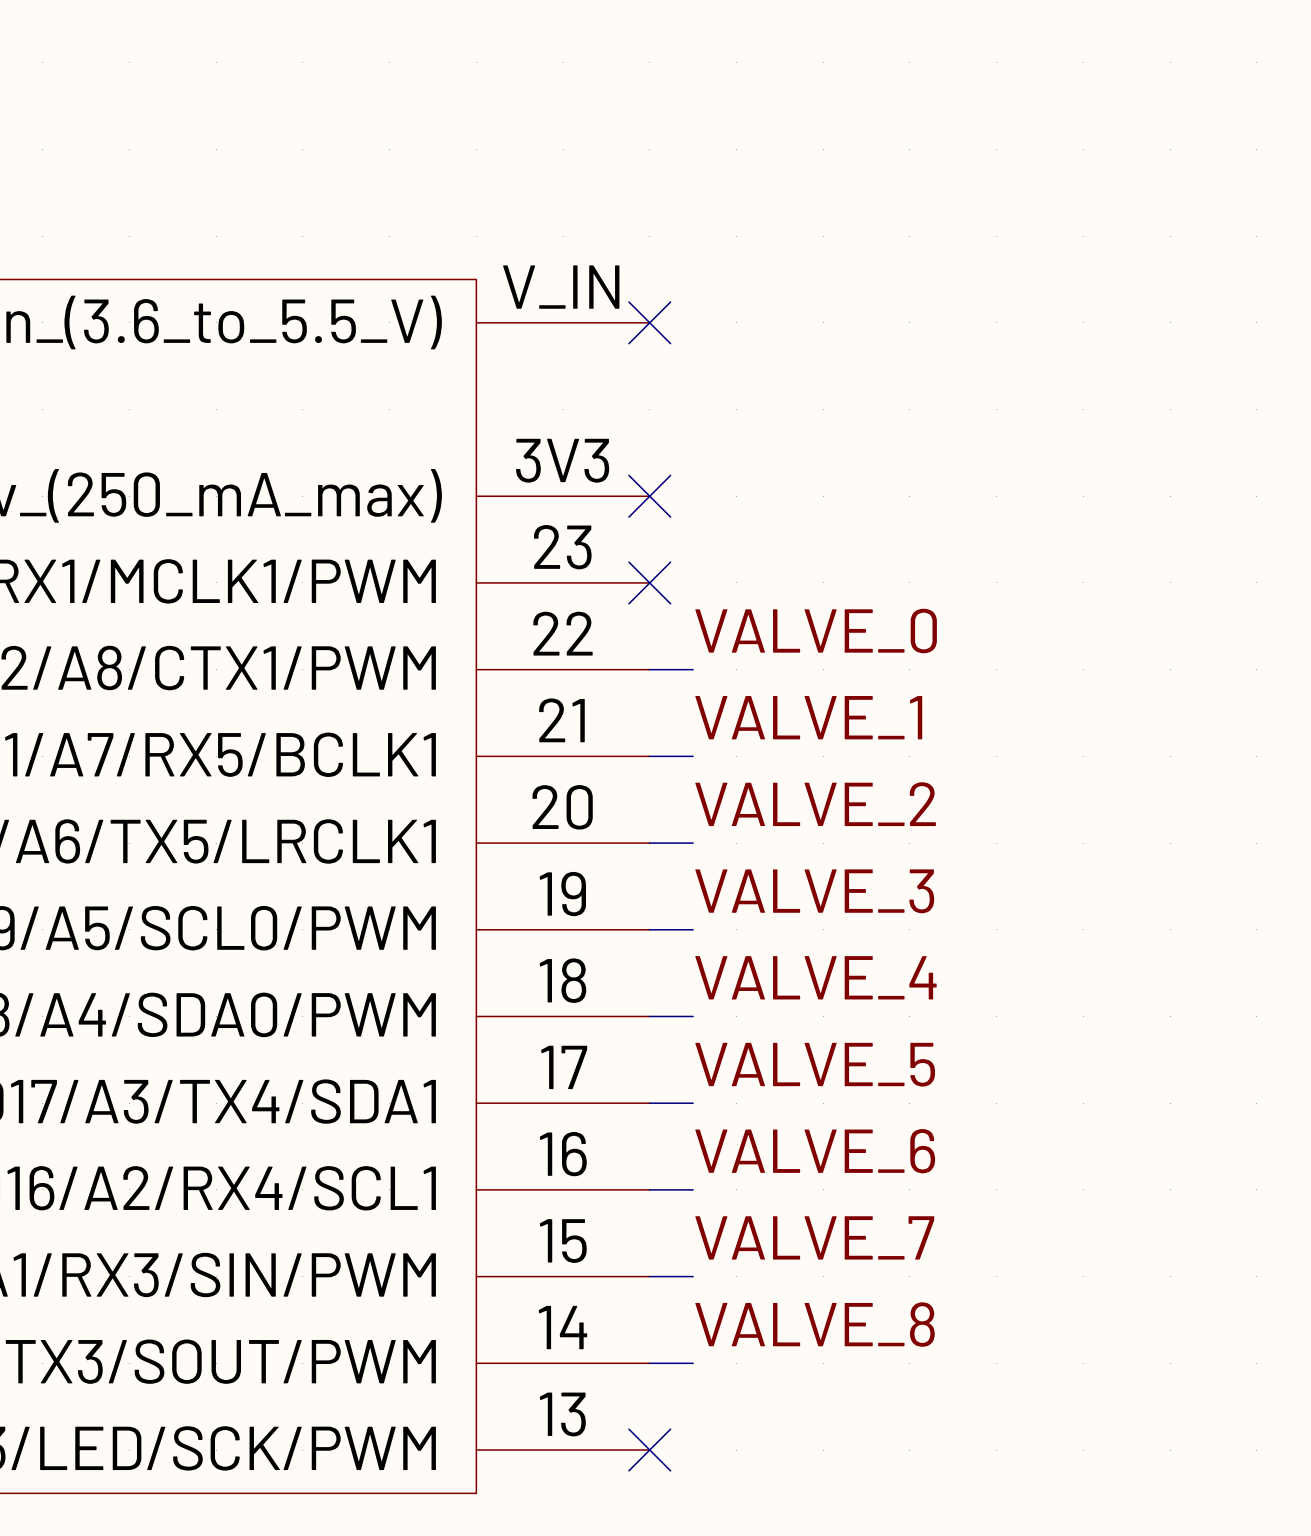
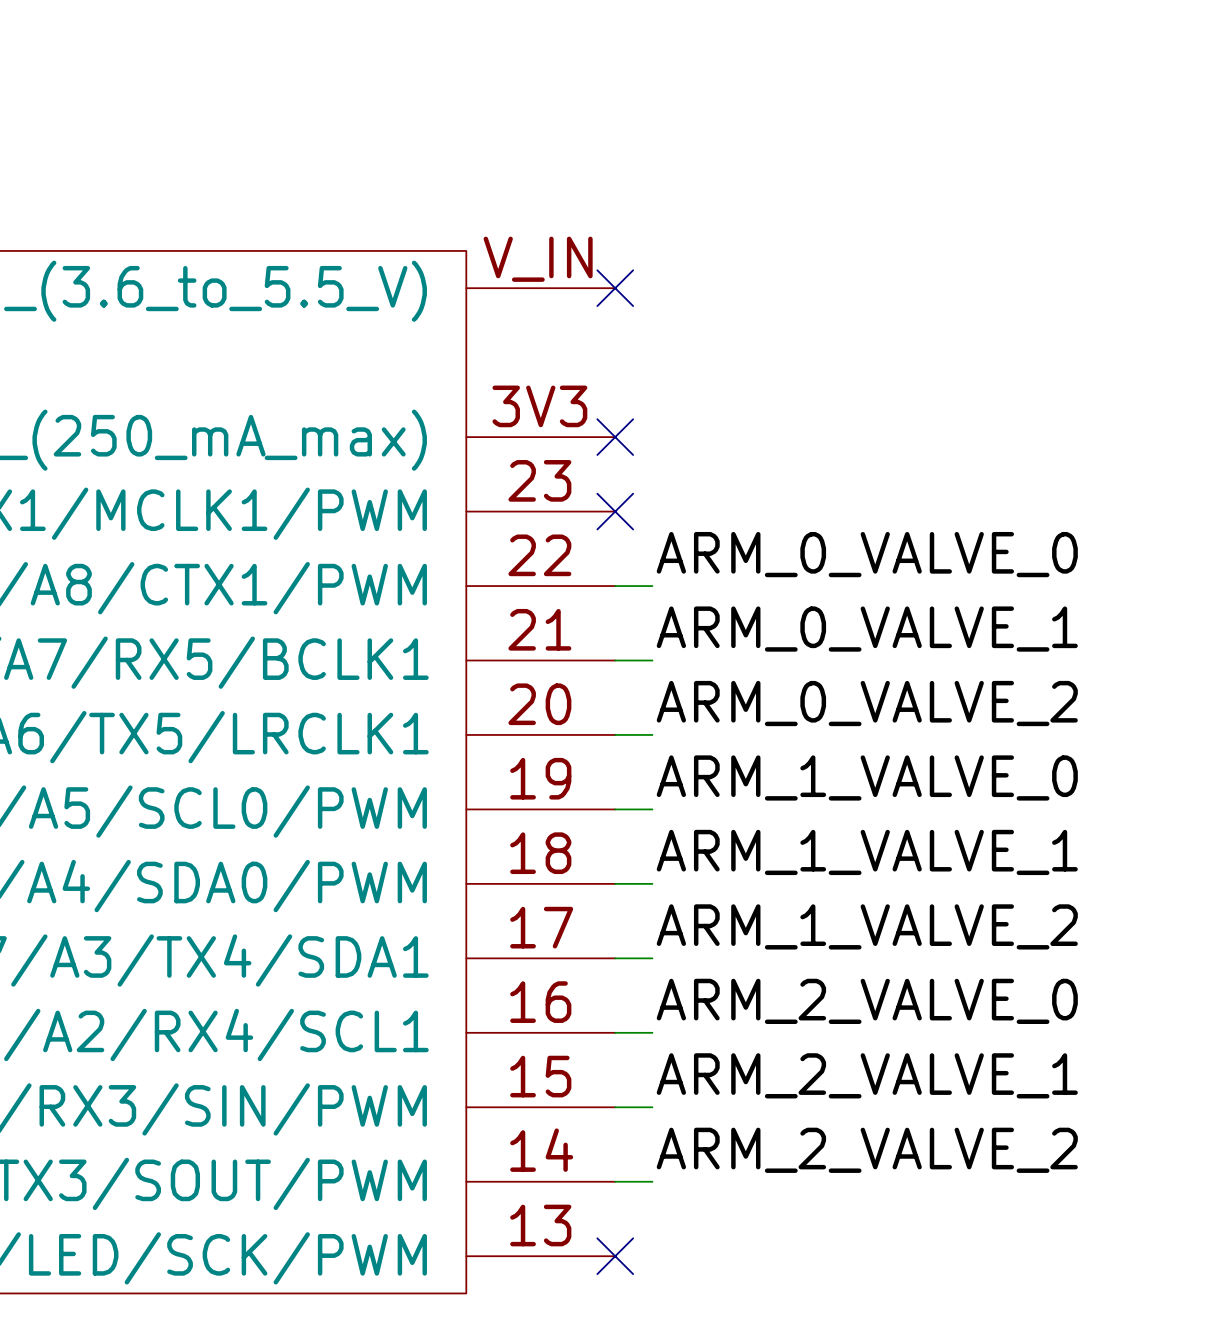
label: VALVE_0 (816, 631) -> ARM_0_VALVE_0 (867, 554)
label: VALVE_1 (808, 717) -> ARM_0_VALVE_1 (867, 629)
label: VALVE_2 (815, 804) -> ARM_0_VALVE_2 (867, 703)
label: VALVE_3 (814, 891) -> ARM_1_VALVE_0 (867, 777)
label: VALVE_4 (815, 977) -> ARM_1_VALVE_1 (867, 852)
label: VALVE_5 (815, 1064) -> ARM_1_VALVE_2 (867, 926)
label: VALVE_6 (815, 1151) -> ARM_2_VALVE_0 (867, 1001)
label: VALVE_7 (814, 1237) -> ARM_2_VALVE_1 (867, 1075)
label: VALVE_8 (815, 1324) -> ARM_2_VALVE_2 (867, 1150)

